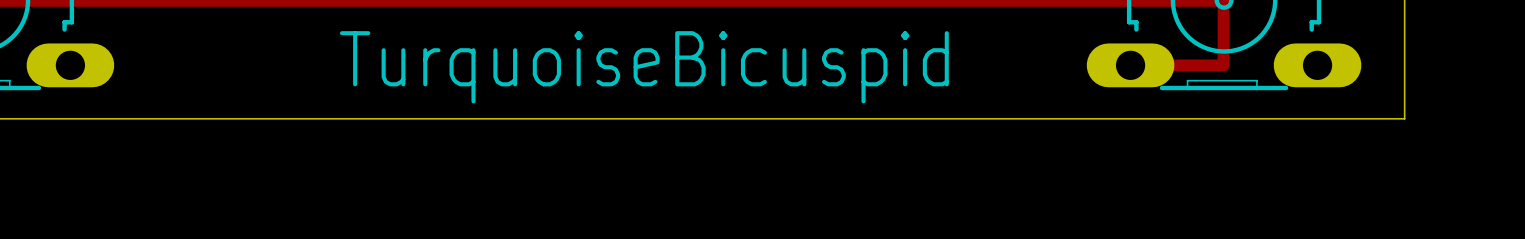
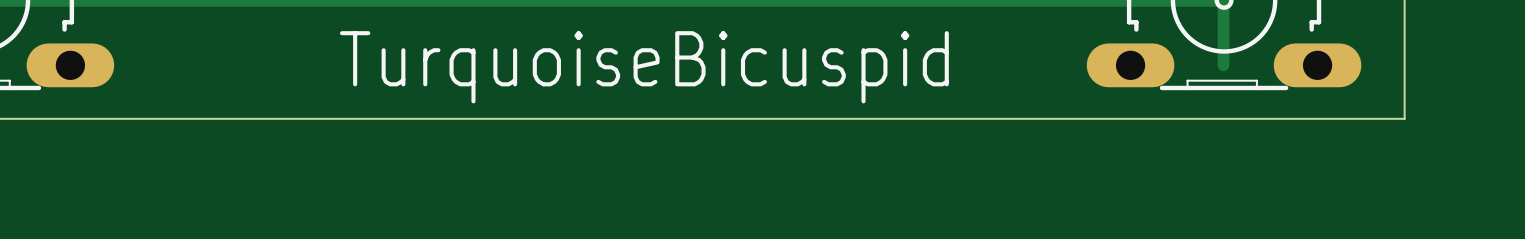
track: (1130, 65) (1223, 65) -> none

